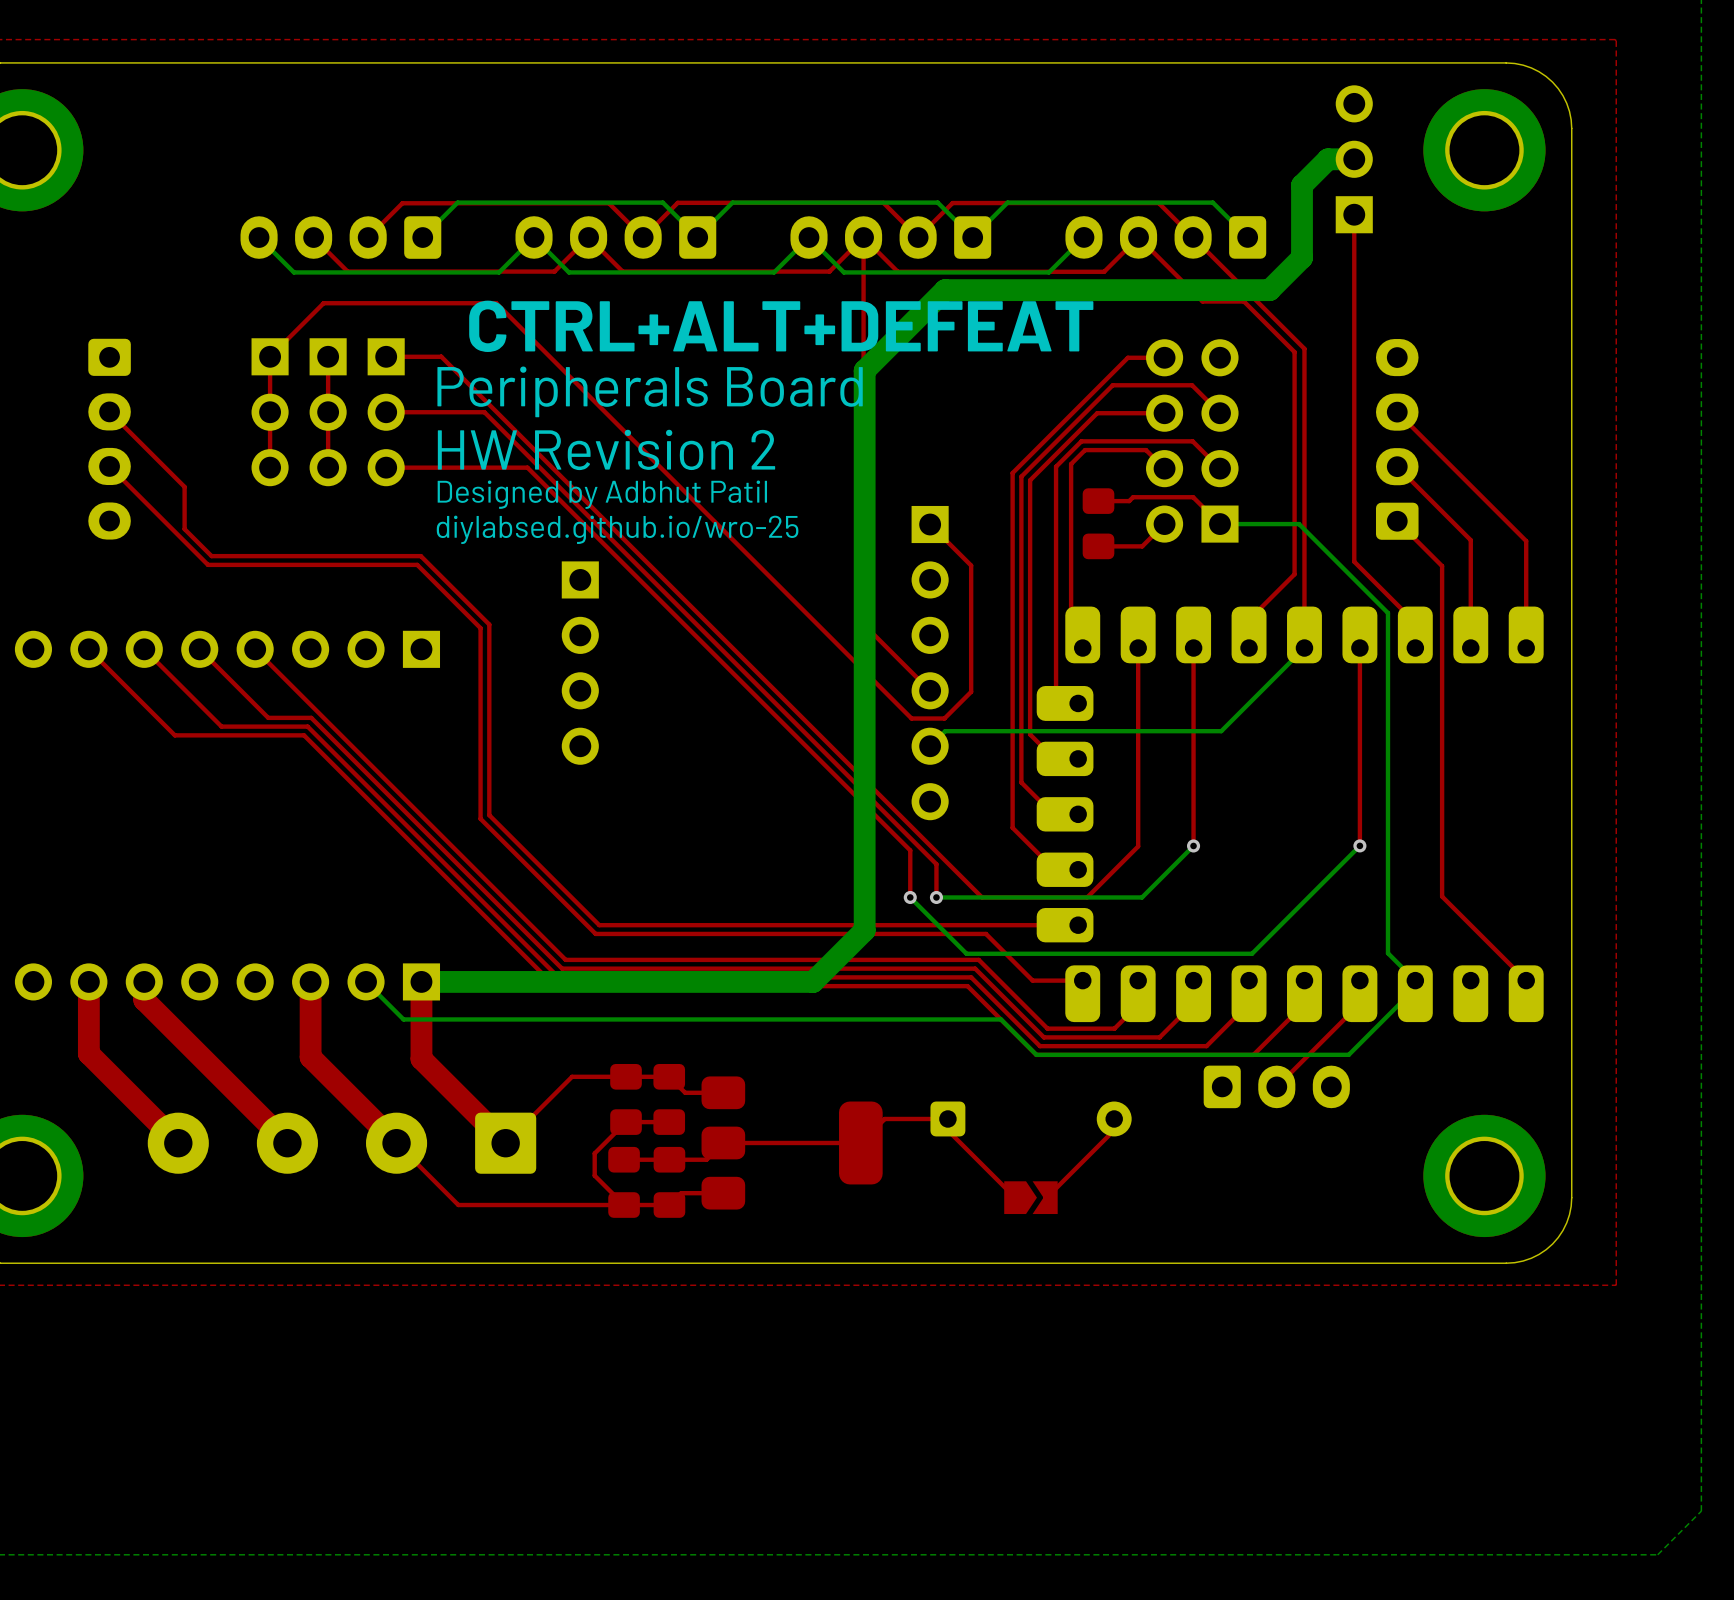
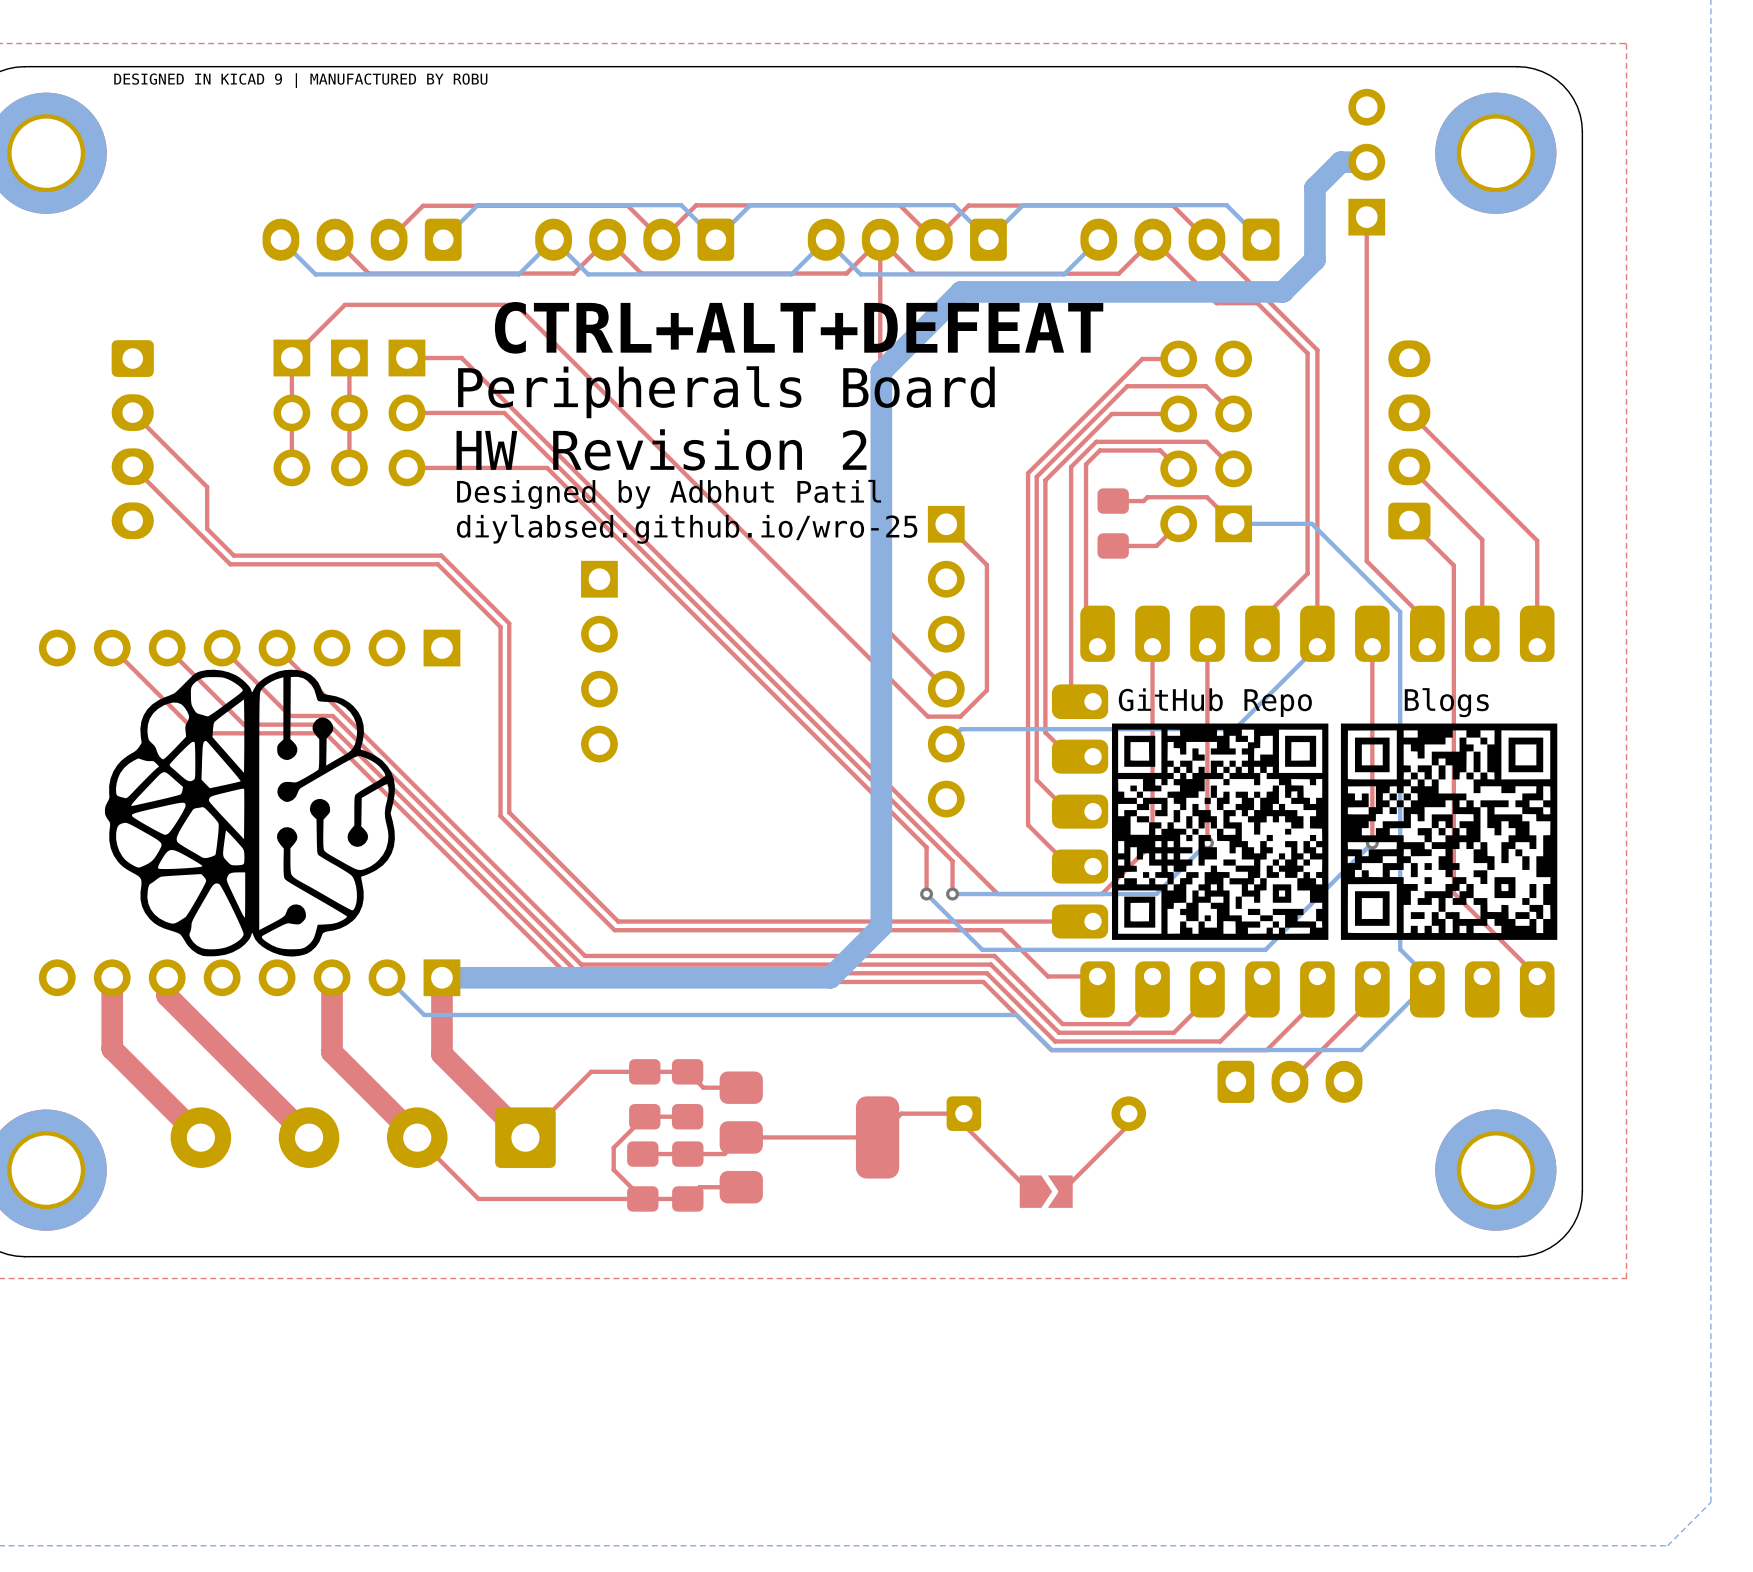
text: none -> DESIGNED IN KICAD 9 | MANUFACTURED BY ROBU (300, 80)
drawing: none -> [104, 669, 395, 957]
text: none -> GitHub Repo (1215, 702)
text: none -> Blogs (1446, 702)
drawing: none -> [1112, 723, 1558, 940]

